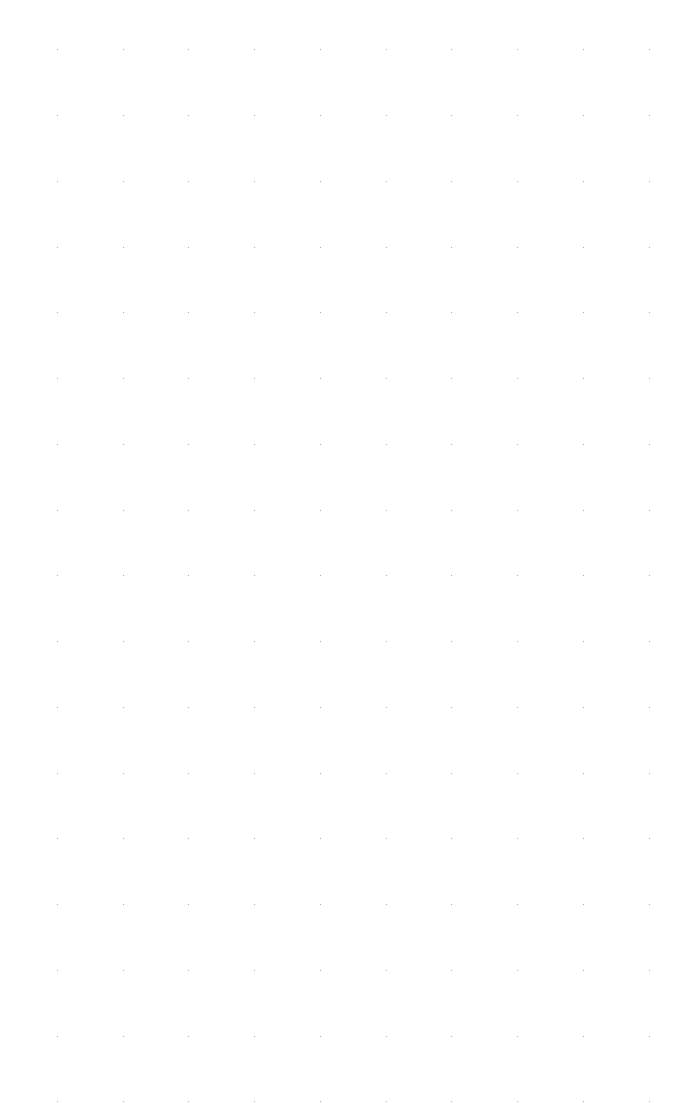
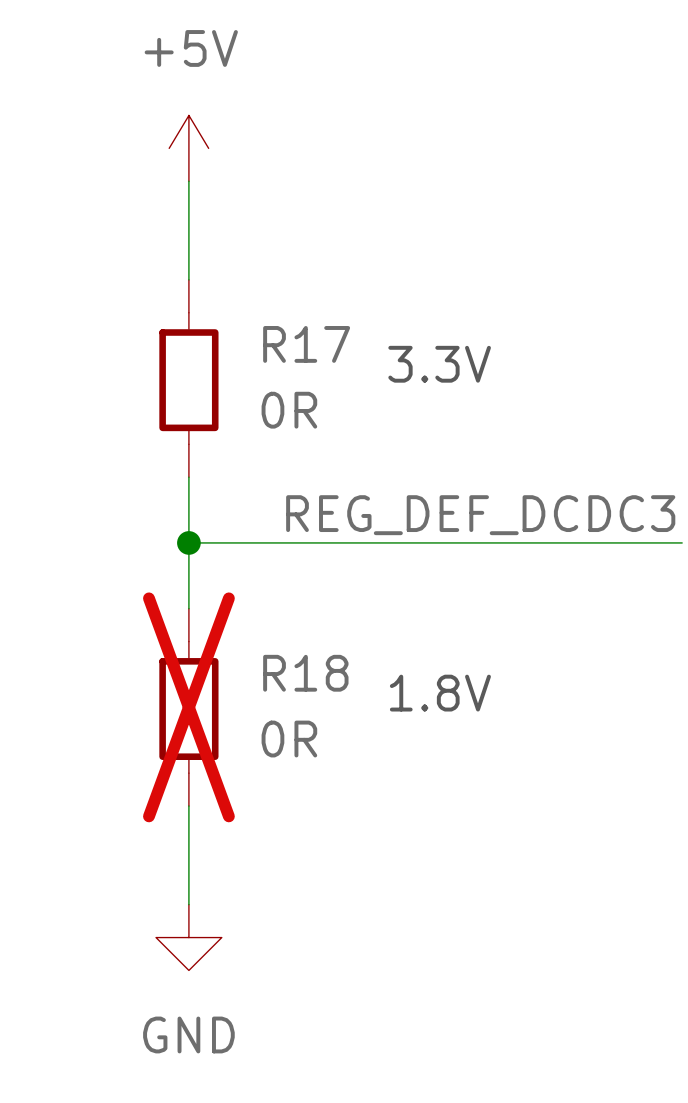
power symbol: none -> +5V (188, 148)
wire: none -> (188, 181) (188, 279)
text: none -> 3.3V (439, 364)
R17: none -> (188, 378)
wire: none -> (188, 477) (188, 608)
label: none -> REG_DEF_DCDC3 (480, 515)
wire: none -> (188, 542) (682, 542)
junction: none -> (188, 542)
text: none -> 1.8V (440, 693)
R18: none -> (188, 707)
wire: none -> (188, 806) (188, 904)
power symbol: none -> GND (188, 937)

